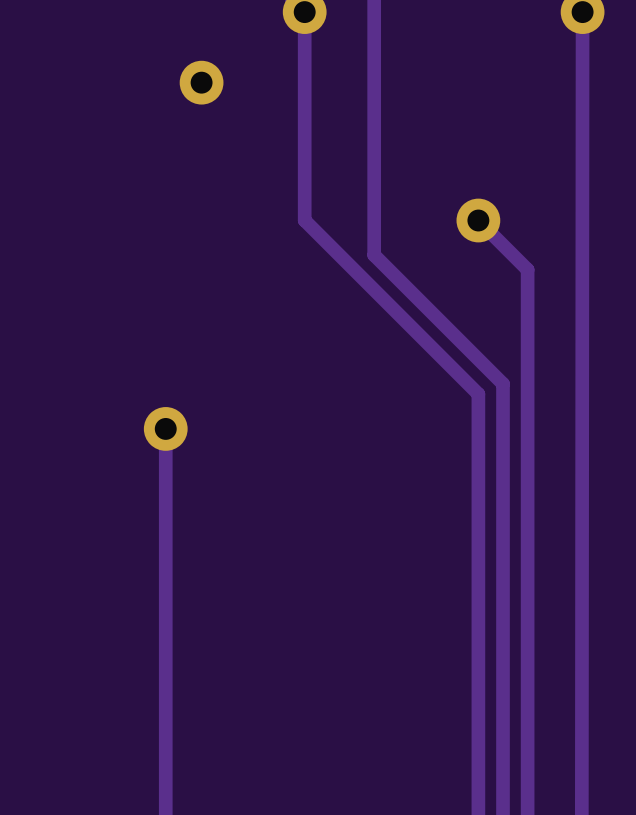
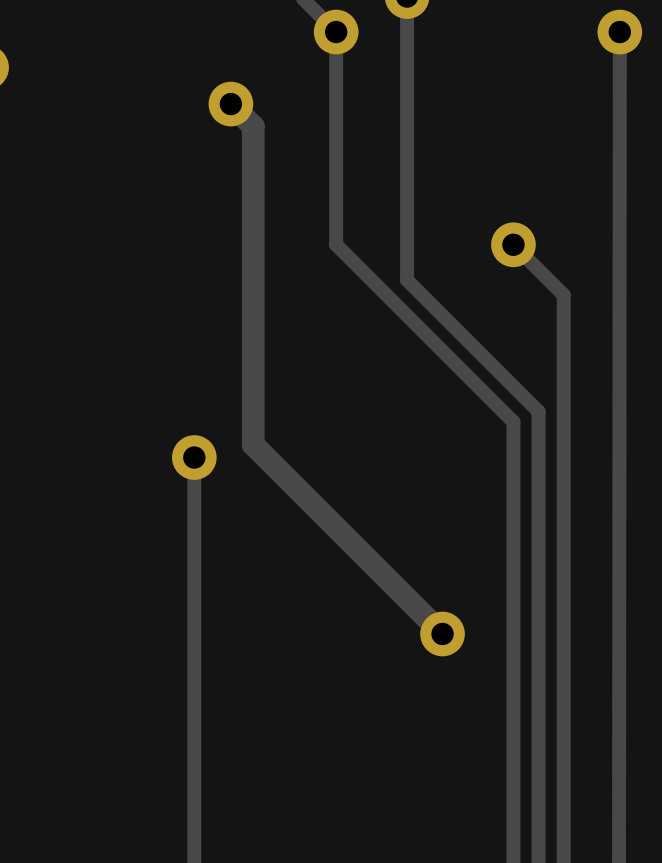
track: none -> (230, 104) (253, 126) (253, 444) (442, 633)
via: none -> (442, 633)

